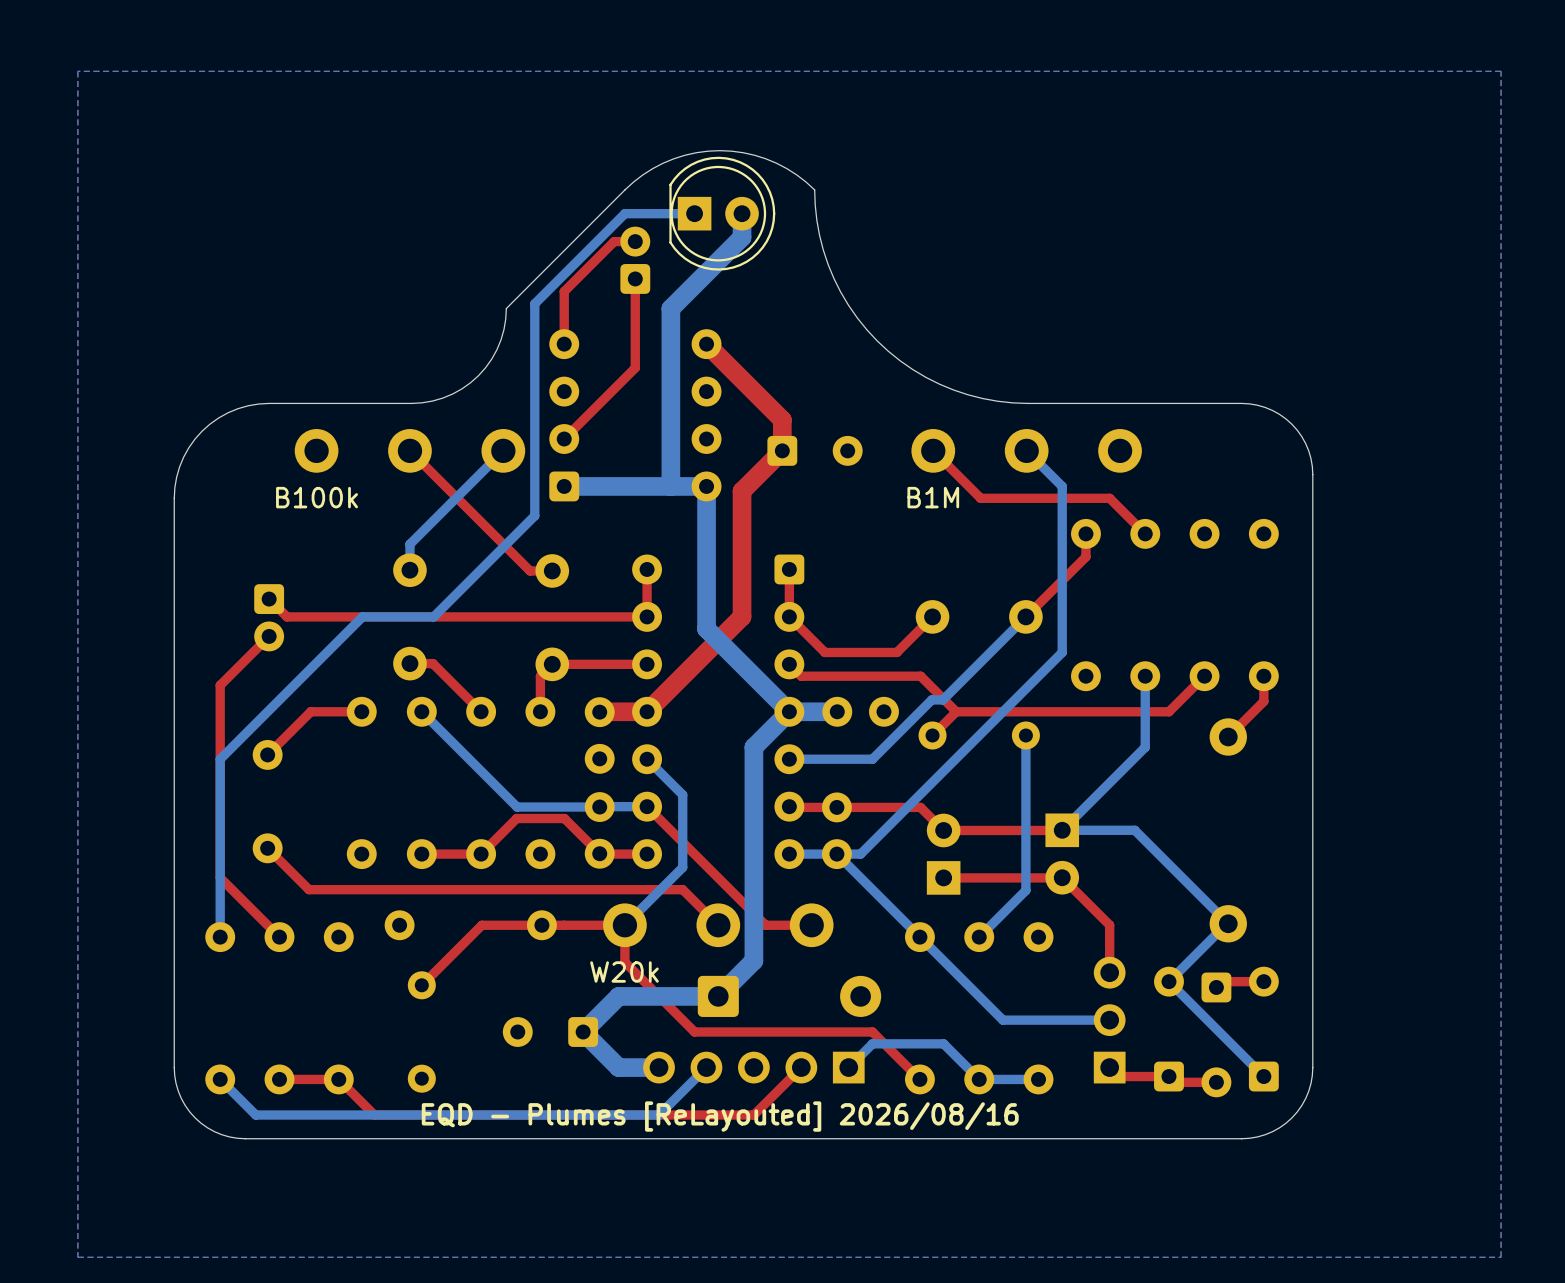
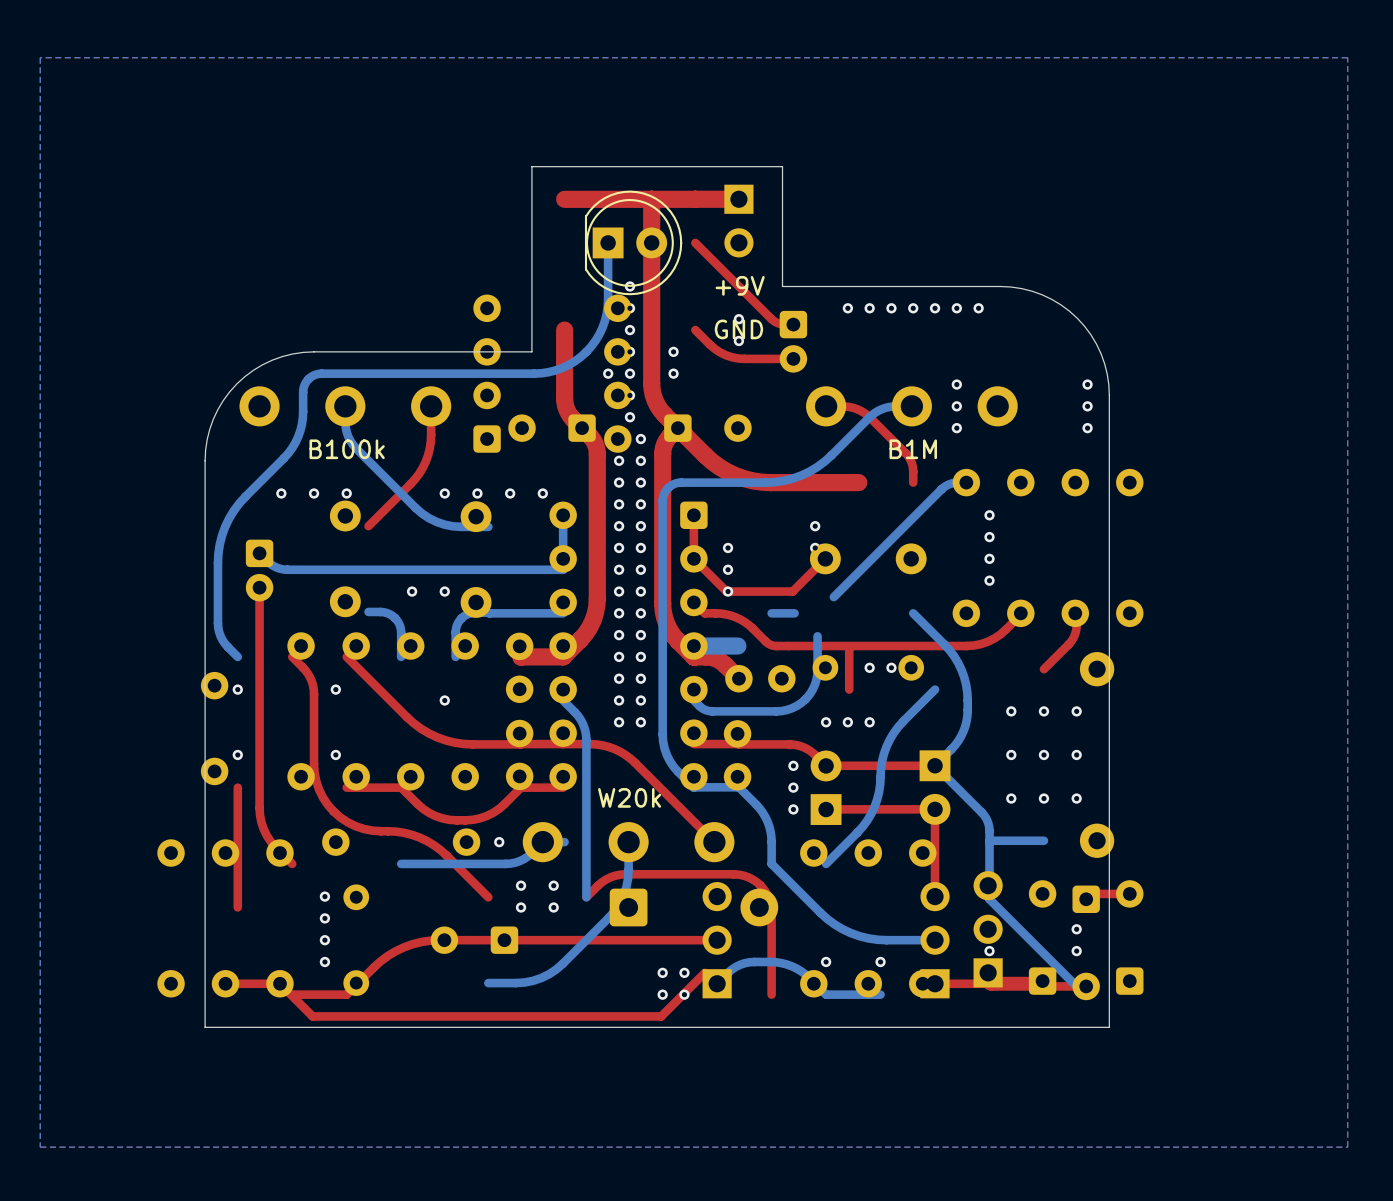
board edge: (814, 189) (816, 220) (823, 250) (840, 292) (857, 317) (877, 340) (900, 360) (925, 377) (968, 394) (1012, 402) (1241, 403) (1257, 405) (1272, 410) (1286, 418) (1297, 430) (1305, 443) (1311, 458) (1312, 474) (1312, 1067) (1311, 1083) (1301, 1105) (1291, 1117) (1279, 1127) (1265, 1134) (1241, 1138) (245, 1138) (229, 1136) (207, 1127) (195, 1117) (181, 1098) (176, 1083) (174, 1067) (174, 498) (176, 477) (188, 447) (202, 431) (218, 417) (248, 405) (269, 403) (422, 402) (442, 398) (461, 388) (485, 367) (496, 349) (503, 329) (506, 308) (633, 182) (652, 168) (673, 158) (708, 151) (743, 152) (776, 163) (796, 174) (814, 189) -> (782, 166) (782, 286) (1000, 286) (1021, 288) (1042, 294) (1069, 311) (1084, 326) (1101, 353) (1107, 374) (1109, 395) (1109, 1027) (205, 1027) (205, 460) (209, 429) (223, 400) (237, 383) (253, 370) (272, 360) (292, 353) (314, 351) (531, 351) (531, 166) (782, 166)
bottom track: (694, 213) (624, 213) (534, 303) (534, 515) (433, 616) (362, 616) (220, 759) (220, 937) -> none
part position: (722, 213) -> (633, 242)
bottom track: (742, 213) (742, 237) (670, 308) (670, 486) -> none
top track: none -> (651, 199) (651, 383) (653, 394) (660, 410) (711, 461) (735, 475) (761, 482) (858, 482)
top track: none -> (738, 199) (564, 199)
top track: (635, 241) (614, 241) (564, 291) (564, 344) -> none
part: none -> (738, 221)
part: (635, 260) -> none
bottom track: none -> (608, 242) (607, 306) (602, 327) (586, 351) (562, 368) (533, 373) (321, 373) (308, 379) (303, 387) (301, 424) (295, 442) (283, 458) (239, 503) (228, 518) (221, 535) (217, 562) (218, 627) (222, 640) (237, 656)
top track: none -> (695, 242) (773, 320) (780, 323) (793, 324)
top track: (635, 278) (635, 367) (564, 439) -> none
text: none -> +9V (740, 285)
via: none -> (629, 286)
top track: (706, 344) (782, 419) (782, 450) (742, 491) (742, 616) (647, 711) (599, 712) -> none
via: none -> (629, 308)
via: none -> (847, 308)
via: none -> (869, 308)
via: none -> (891, 308)
via: none -> (913, 308)
via: none -> (935, 308)
via: none -> (956, 308)
via: none -> (978, 308)
via: none -> (738, 319)
top track: none -> (564, 330) (565, 406) (570, 416) (592, 439) (597, 451) (596, 606) (589, 627) (563, 656) (521, 657)
via: none -> (629, 330)
top track: none -> (695, 330) (714, 348) (731, 357) (793, 358)
text: none -> GND (738, 329)
via: none -> (738, 340)
part: none -> (793, 341)
via: none -> (629, 351)
via: none -> (673, 351)
via: none -> (608, 373)
via: none -> (629, 373)
via: none -> (673, 373)
via: none -> (956, 384)
via: none -> (1087, 384)
via: none -> (629, 395)
bottom track: none -> (345, 406) (346, 431) (353, 445) (421, 513) (444, 524) (488, 526)
top track: (409, 450) (530, 570) (552, 570) -> none
bottom track: (503, 450) (409, 544) (409, 570) -> none
top track: none -> (431, 406) (430, 441) (422, 467) (410, 483) (368, 526)
part position: (815, 450) -> (707, 428)
top track: (933, 450) (980, 498) (1109, 498) (1145, 533) -> (826, 406) (850, 407) (867, 415) (908, 457) (912, 466) (913, 482)
bottom track: (1026, 450) (1062, 486) (1062, 652) (860, 854) (789, 854) -> (911, 406) (888, 407) (875, 412) (824, 461) (809, 471) (792, 478) (765, 482) (679, 482) (672, 484) (666, 489) (662, 501) (662, 734) (664, 748) (669, 761) (693, 787) (738, 787) (759, 808) (767, 821) (770, 831) (771, 863) (827, 918) (842, 929) (868, 938) (935, 940)
via: none -> (956, 406)
via: none -> (1087, 406)
via: none -> (629, 417)
part: none -> (552, 428)
via: none -> (956, 428)
via: none -> (1087, 428)
top track: none -> (670, 435) (664, 444) (662, 454) (663, 610) (666, 624) (673, 636) (694, 656)
bottom track: (564, 486) (706, 486) (706, 628) (789, 711) (753, 747) (753, 960) (718, 996) (618, 996) (583, 1031) (618, 1067) (659, 1067) -> none
via: none -> (640, 439)
part value position: B100k (317, 497) -> B100k (347, 449)
part value position: B1M (933, 497) -> B1M (913, 449)
via: none -> (619, 460)
via: none -> (640, 460)
via: none -> (619, 482)
via: none -> (640, 482)
top track: (1085, 533) (1085, 556) (1025, 616) -> none
bottom track: none -> (967, 482) (953, 483) (943, 487) (833, 597)
via: none -> (281, 493)
via: none -> (314, 493)
via: none -> (346, 493)
via: none -> (444, 493)
via: none -> (477, 493)
via: none -> (510, 493)
via: none -> (542, 493)
via: none -> (619, 504)
via: none -> (640, 504)
top track: (647, 569) (647, 616) (286, 616) (269, 599) -> none
via: none -> (989, 515)
bottom track: none -> (563, 526) (563, 569) (287, 569) (273, 566) (259, 553)
via: none -> (619, 526)
via: none -> (640, 526)
via: none -> (815, 526)
via: none -> (989, 537)
via: none -> (619, 547)
via: none -> (640, 547)
via: none -> (728, 547)
via: none -> (815, 547)
bottom track: (1025, 616) (942, 699) (931, 699) (872, 759) (789, 759) -> none
via: none -> (989, 558)
part position: (269, 617) -> (259, 570)
via: none -> (619, 569)
via: none -> (640, 569)
via: none -> (728, 569)
top track: (269, 636) (220, 685) (220, 877) (279, 937) -> none
via: none -> (989, 580)
top track: none -> (259, 587) (260, 815) (267, 836) (292, 863)
via: none -> (412, 591)
via: none -> (444, 591)
via: none -> (619, 591)
via: none -> (640, 591)
via: none -> (728, 591)
top track: (409, 663) (432, 663) (481, 711) -> none
top track: (647, 664) (552, 664) (540, 676) (540, 711) -> none
bottom track: none -> (368, 611) (386, 612) (397, 621) (401, 630) (401, 656)
bottom track: none -> (563, 613) (467, 614) (461, 618) (456, 627) (455, 656)
via: none -> (619, 613)
via: none -> (640, 613)
top track: (813, 676) (920, 676) (956, 711) (932, 735) -> (715, 613) (731, 615) (740, 619) (772, 645) (847, 646)
bottom track: none -> (794, 613) (771, 613)
bottom track: none -> (913, 613) (949, 650) (958, 663) (964, 677) (967, 700) (965, 726) (955, 745) (935, 765) (981, 812) (987, 821) (989, 831) (989, 899) (1076, 986)
bottom track: (1145, 676) (1145, 747) (1062, 830) -> none
top track: (1204, 676) (1168, 711) (1086, 711) -> (1022, 613) (994, 638) (980, 644) (966, 646)
top track: none -> (1076, 613) (1076, 627) (1073, 638) (1043, 669)
top track: (1263, 676) (1263, 701) (1228, 737) -> none
via: none -> (619, 635)
via: none -> (640, 635)
bottom track: none -> (817, 636) (815, 682) (808, 696) (796, 705) (776, 711) (712, 711) (703, 708) (693, 700)
top track: (361, 711) (310, 711) (267, 754) -> none
bottom track: (421, 711) (517, 807) (647, 806) -> none
part position: (860, 711) -> (760, 678)
top track: none -> (848, 646) (849, 689)
top track: none -> (292, 656) (307, 673) (313, 686) (314, 772) (319, 789) (327, 804) (340, 817) (355, 826) (372, 830) (404, 832) (427, 841) (446, 855) (488, 897)
via: none -> (619, 656)
via: none -> (640, 656)
top track: none -> (694, 656) (708, 657) (718, 660) (738, 678)
via: none -> (869, 667)
via: none -> (891, 667)
bottom track: (1025, 735) (1025, 890) (979, 937) -> none
via: none -> (619, 678)
via: none -> (640, 678)
via: none -> (237, 689)
via: none -> (335, 689)
bottom track: (647, 759) (682, 794) (682, 867) (624, 925) -> none
bottom track: none -> (935, 689) (898, 726) (889, 739) (882, 761) (877, 799) (867, 820) (826, 863)
via: none -> (444, 700)
bottom track: none -> (563, 700) (579, 718) (586, 736) (586, 897)
via: none -> (619, 700)
via: none -> (640, 700)
via: none -> (1011, 711)
via: none -> (1043, 711)
via: none -> (1076, 711)
via: none -> (619, 722)
via: none -> (640, 722)
via: none -> (826, 722)
via: none -> (847, 722)
via: none -> (869, 722)
top track: (789, 806) (920, 807) (943, 830) (1062, 830) -> none
top track: (646, 807) (765, 925) (811, 925) -> (346, 656) (413, 723) (428, 733) (445, 740) (472, 744) (596, 744) (620, 751) (635, 762) (714, 842)
top track: none -> (693, 744) (796, 745) (809, 750) (826, 765) (935, 765)
via: none -> (237, 754)
via: none -> (335, 754)
bottom track: (1062, 830) (1134, 830) (1228, 923) (1168, 981) (1263, 1076) -> none
via: none -> (1011, 754)
via: none -> (1043, 754)
via: none -> (1076, 754)
via: none -> (793, 765)
top track: (267, 848) (309, 889) (682, 889) (718, 925) -> none
top track: (647, 854) (600, 854) (564, 818) (516, 818) (481, 854) (421, 854) -> none
bottom track: (836, 854) (1002, 1020) (1109, 1020) -> none
part position: (943, 854) -> (826, 787)
part position: (1062, 854) -> (935, 787)
top track: none -> (237, 787) (237, 907)
top track: none -> (563, 787) (521, 787) (493, 812) (479, 818) (465, 820) (442, 818) (429, 812) (401, 787) (346, 787)
via: none -> (793, 787)
top track: (943, 877) (1062, 877) (1109, 925) (1109, 972) -> none
via: none -> (1011, 798)
via: none -> (1043, 798)
via: none -> (1076, 798)
via: none -> (793, 809)
top track: none -> (826, 809) (935, 809) (935, 896)
bottom track: none -> (1043, 840) (990, 841)
via: none -> (499, 842)
bottom track: none -> (564, 842) (542, 842) (524, 858) (510, 863) (401, 863)
bottom track: none -> (628, 842) (626, 887) (619, 903) (608, 917) (563, 963) (549, 974) (524, 982) (488, 983)
via: none -> (521, 885)
part value position: W20k (624, 972) -> W20k (629, 797)
via: none -> (553, 885)
via: none -> (324, 896)
top track: (421, 985) (481, 925) (624, 925) (624, 962) (694, 1031) -> (292, 994) (346, 994) (388, 955) (404, 947) (421, 941) (439, 940) (606, 940)
top track: none -> (586, 897) (606, 879) (620, 874) (733, 874) (751, 878) (765, 891) (770, 904) (771, 994)
via: none -> (521, 907)
via: none -> (553, 907)
via: none -> (324, 918)
via: none -> (1076, 929)
via: none -> (324, 940)
top track: (814, 1031) (872, 1031) (919, 1079) -> none
part: none -> (717, 940)
part: none -> (935, 940)
via: none -> (989, 951)
via: none -> (1076, 951)
via: none -> (324, 961)
via: none -> (826, 961)
via: none -> (880, 961)
bottom track: (706, 1067) (659, 1115) (255, 1115) (220, 1079) -> none
part: (753, 1067) -> none
via: none -> (662, 972)
via: none -> (684, 972)
bottom track: (848, 1067) (872, 1043) (943, 1043) (979, 1079) (1038, 1079) -> none
bottom track: none -> (717, 983) (731, 969) (740, 964) (749, 962) (775, 962) (786, 964) (801, 971) (826, 994) (880, 994)
top track: none -> (935, 983) (1033, 986)
via: none -> (662, 994)
via: none -> (684, 994)
text: EQD - Plumes [ReLayouted] 2026/08/16 (720, 1116) -> none

